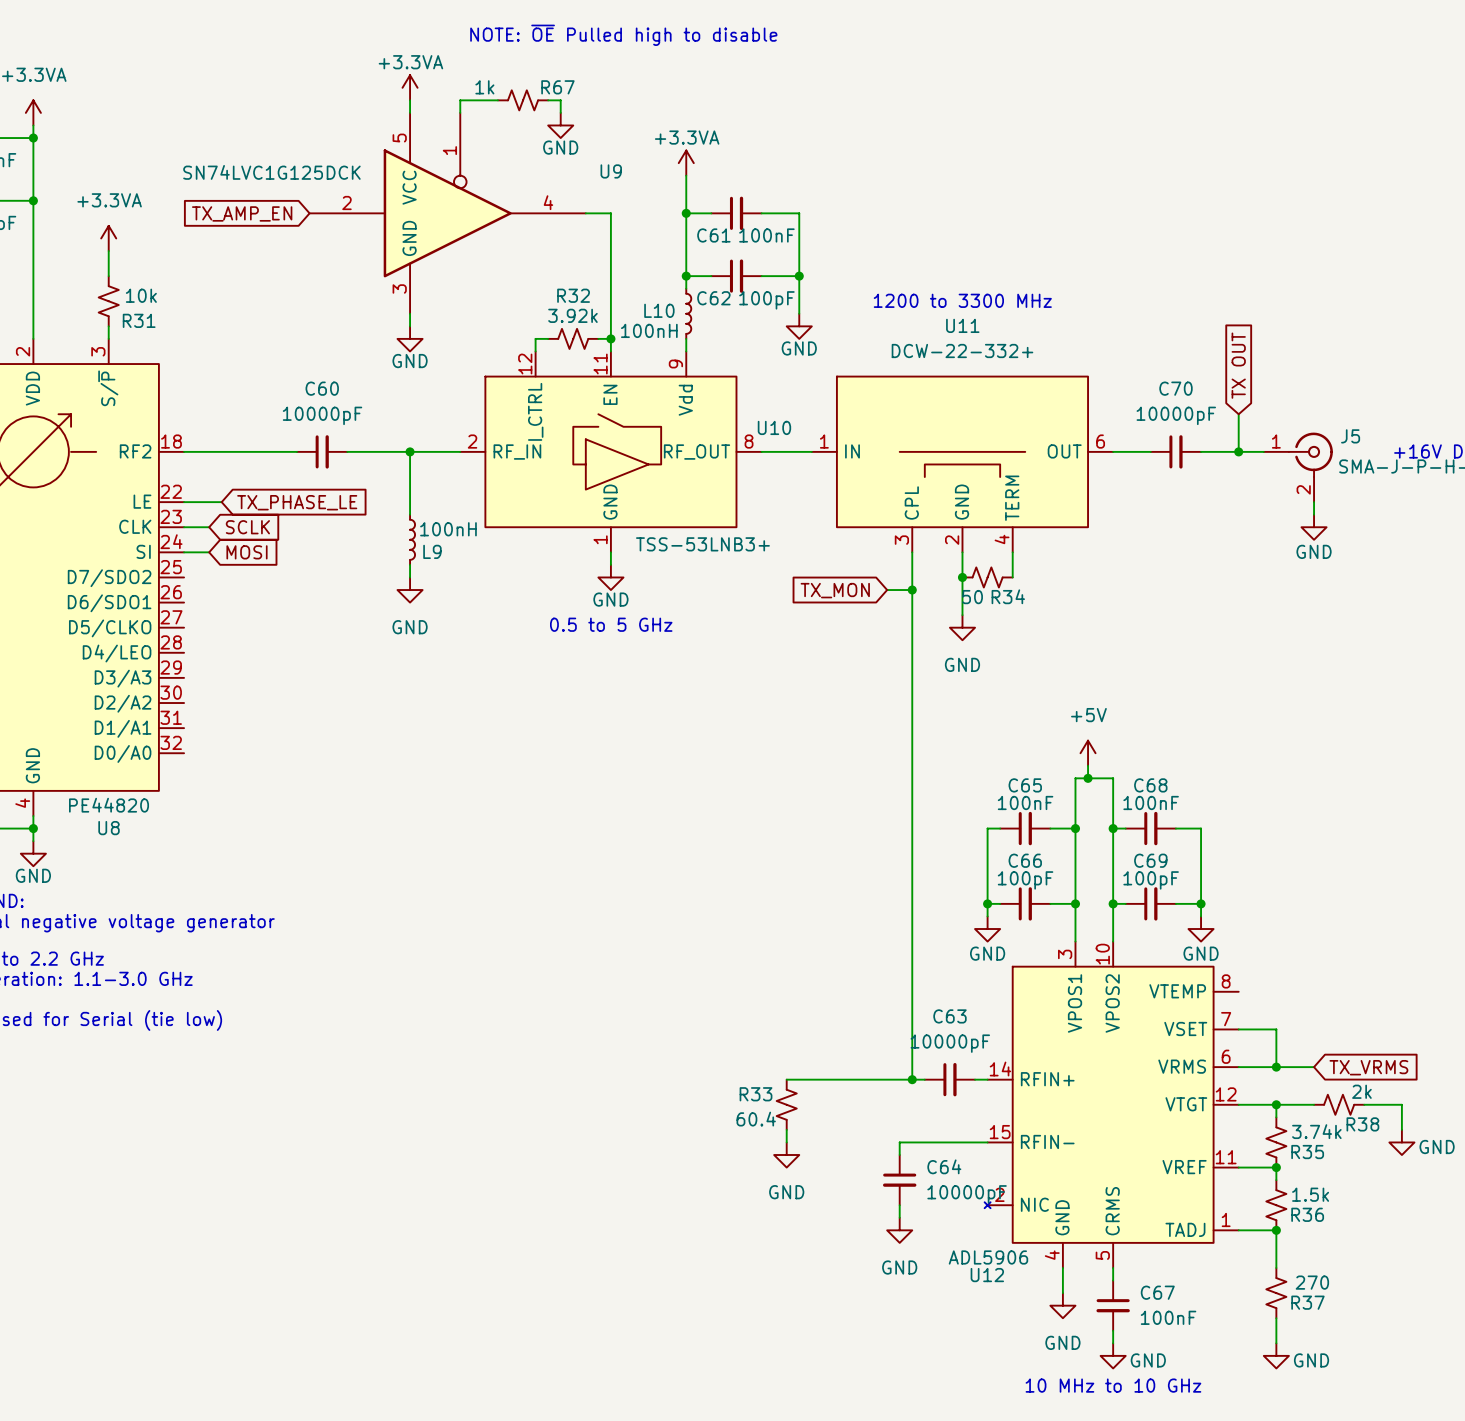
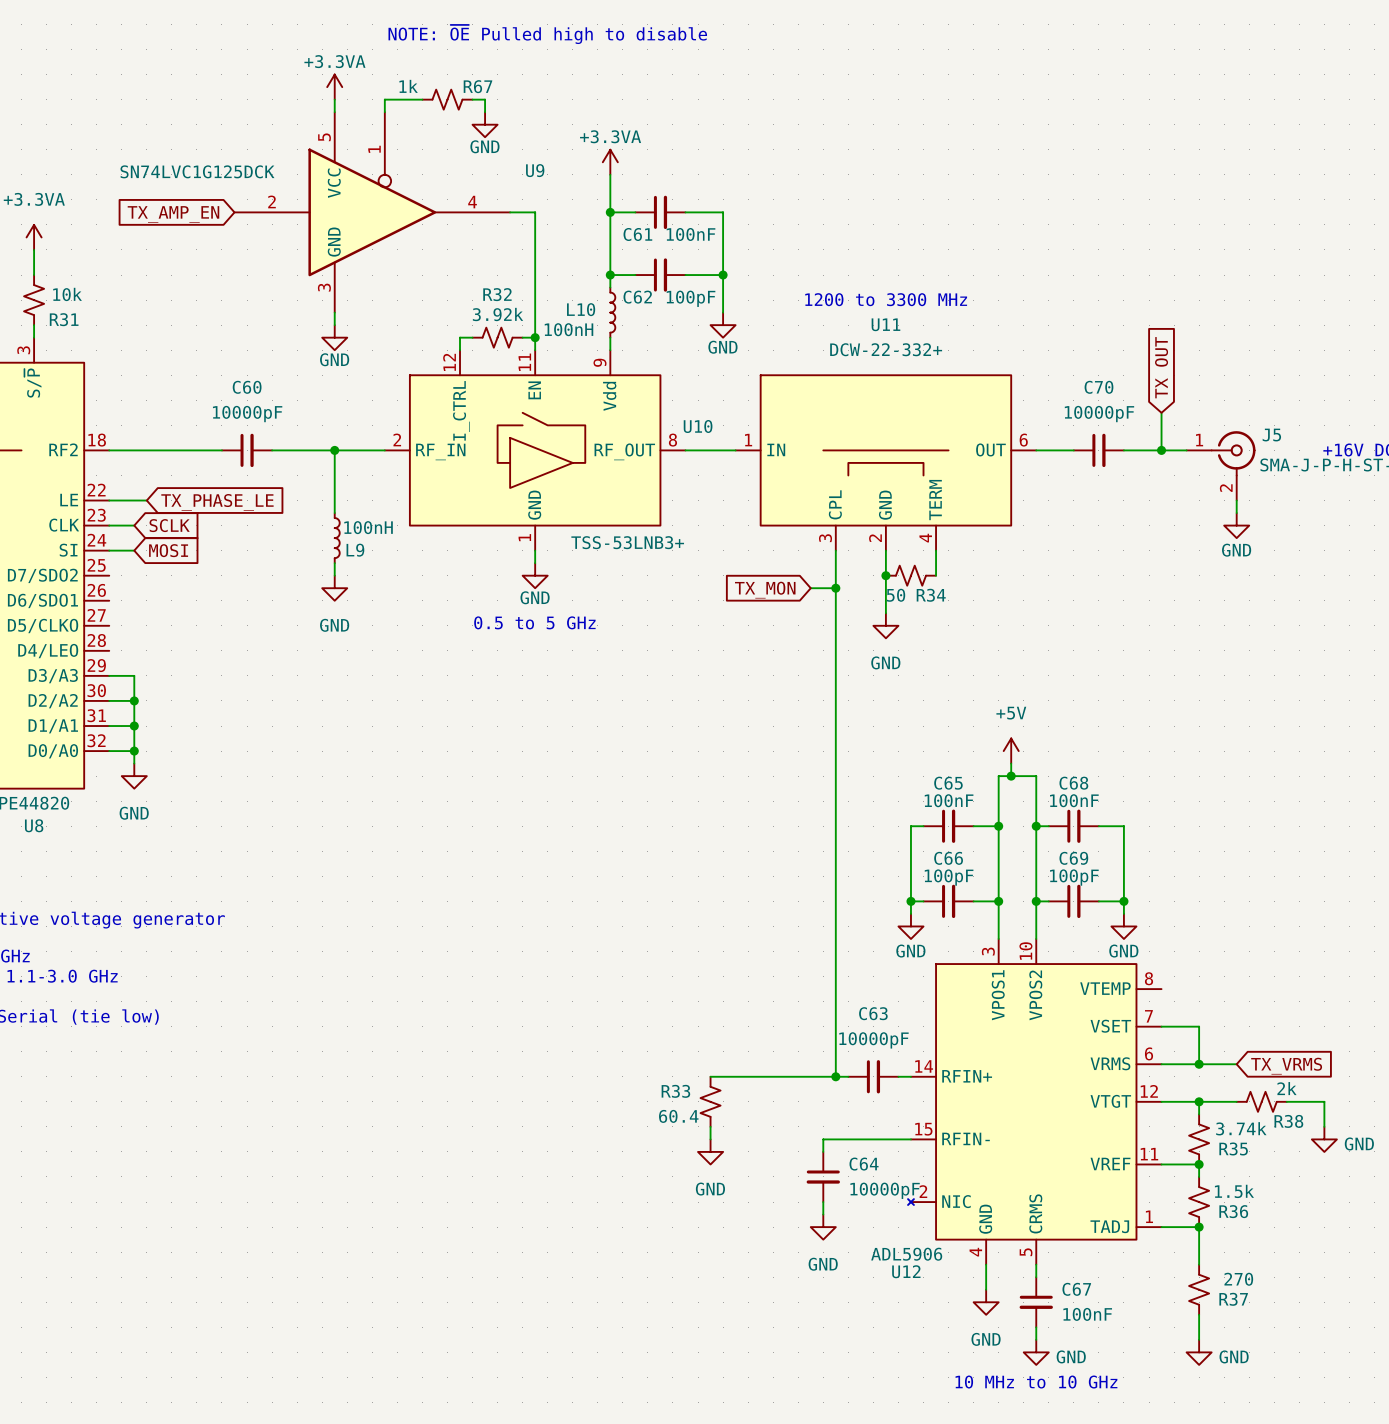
wire: none -> (109, 675) (134, 675) (134, 763)
wire: none -> (109, 700) (134, 700)
junction: none -> (134, 700)
wire: none -> (109, 726) (134, 726)
junction: none -> (134, 726)
wire: none -> (109, 751) (134, 751)
junction: none -> (134, 751)
power symbol: none -> GND (134, 776)

